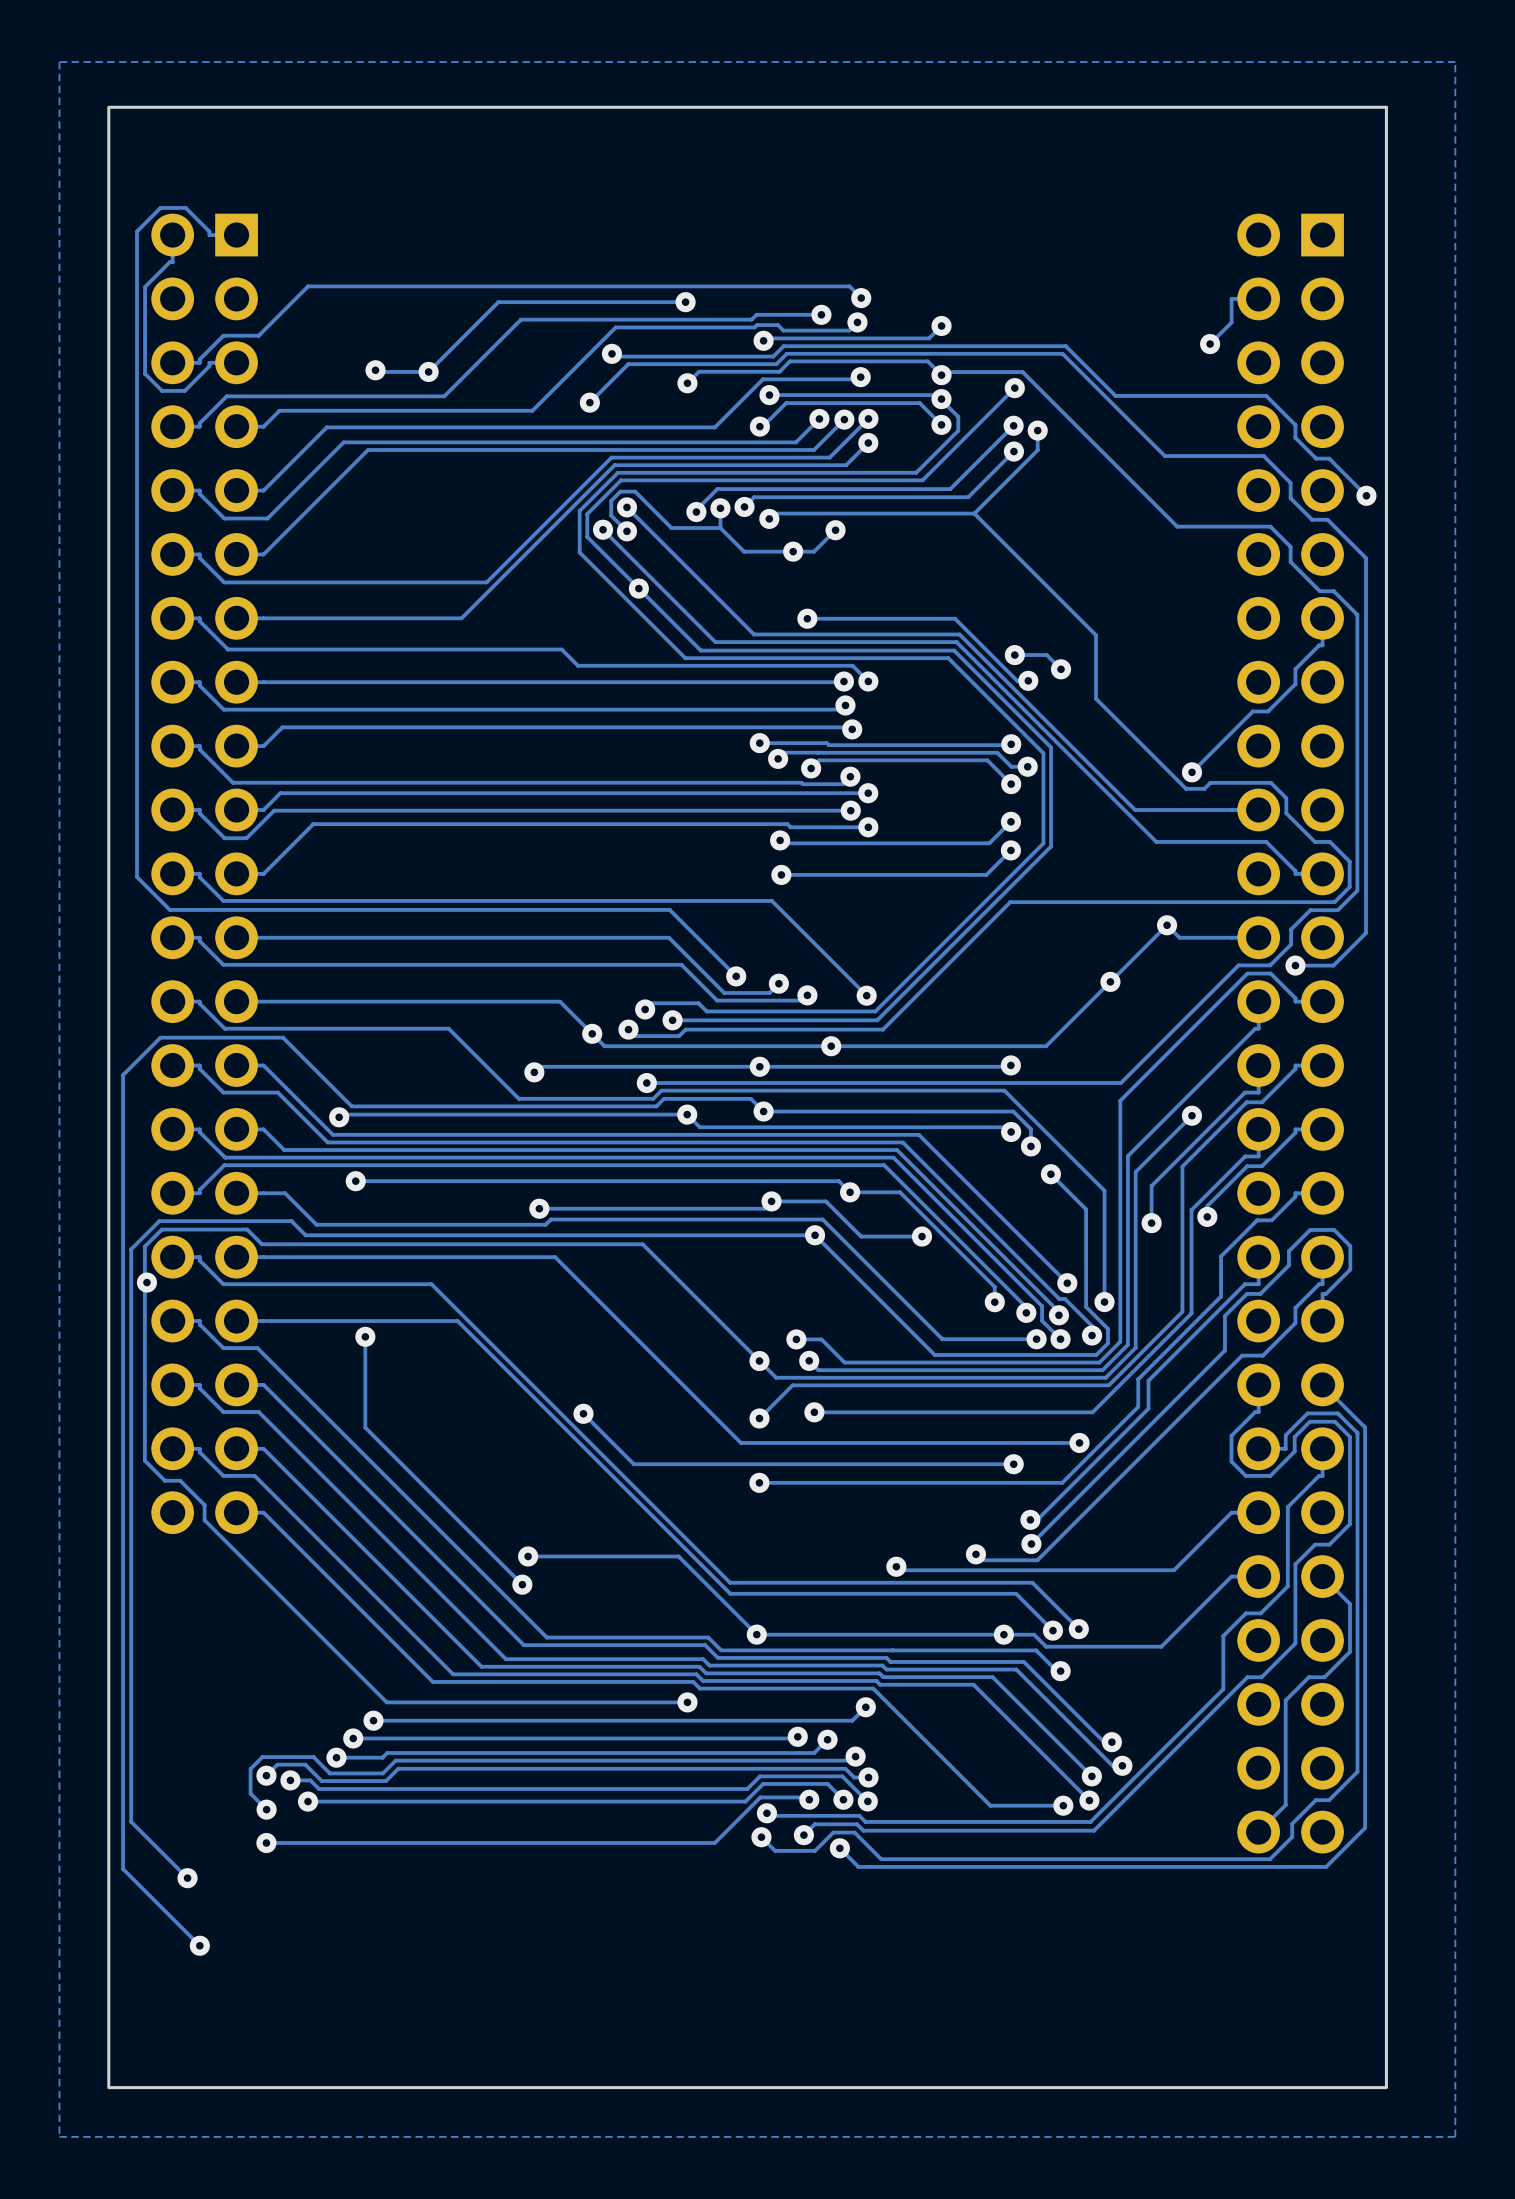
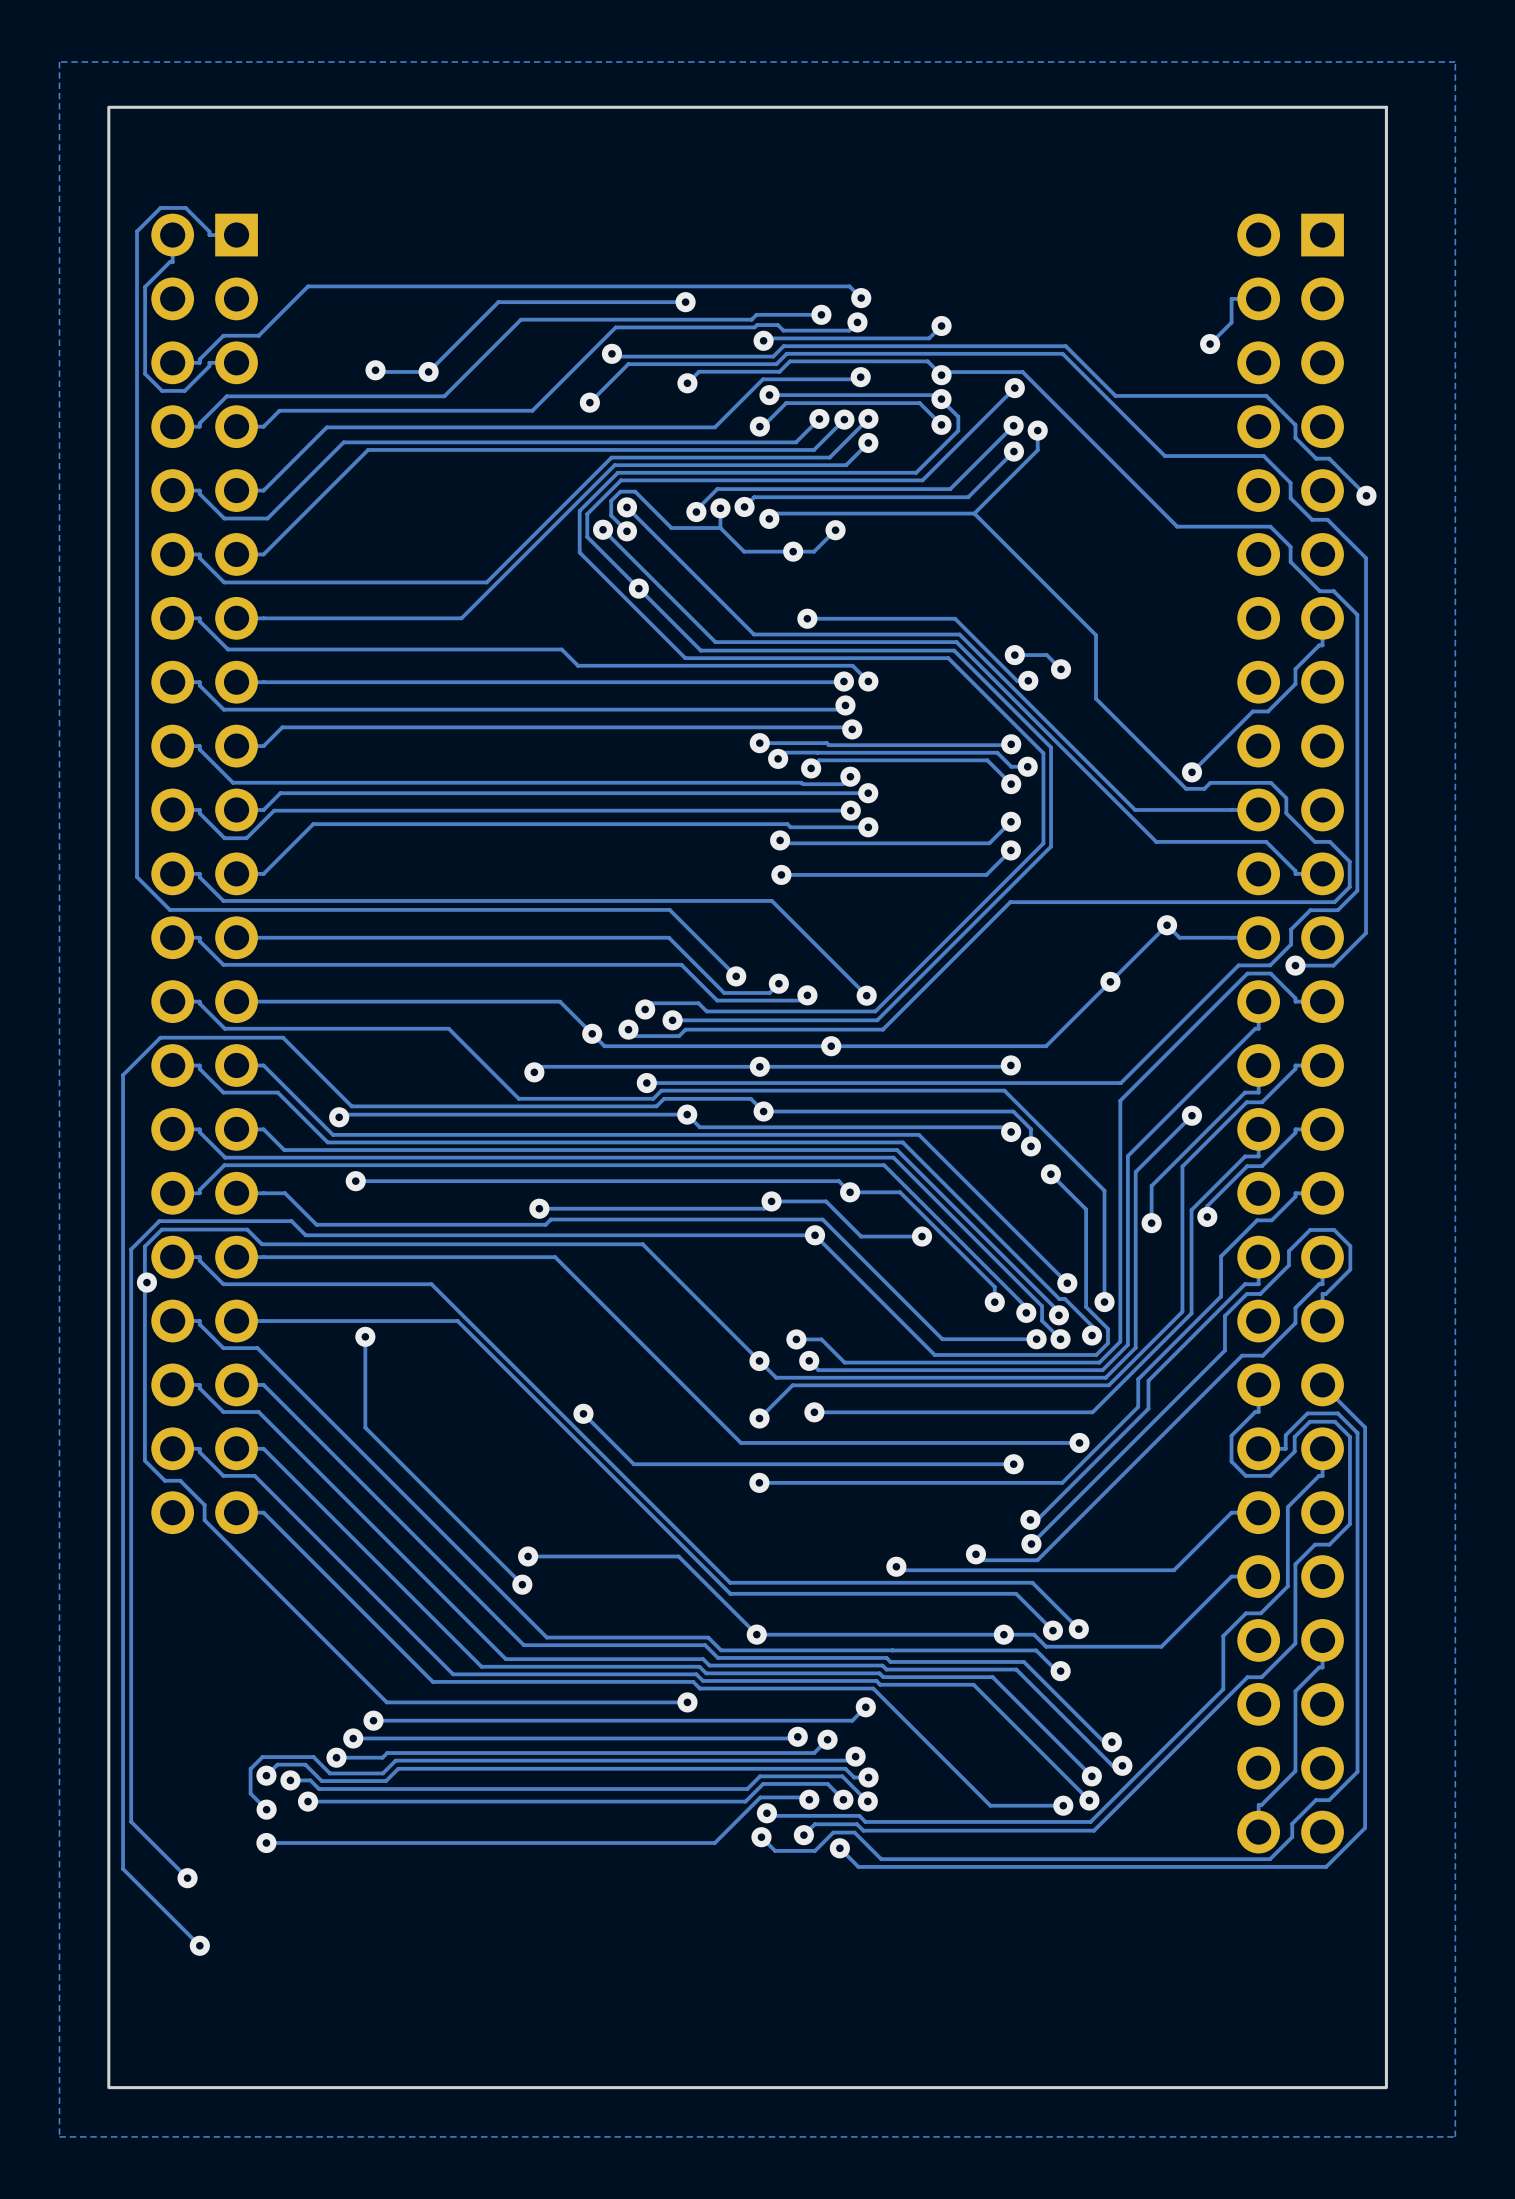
track: (1322, 1576) (1349, 1604) (1349, 1651) (1324, 1677) (1308, 1677) (1285, 1700) (1285, 1805) (1258, 1832) -> (1322, 1640) (1322, 1667) (1319, 1667) (1295, 1691) (1295, 1771) (1261, 1805) (1258, 1805) (1258, 1832)

